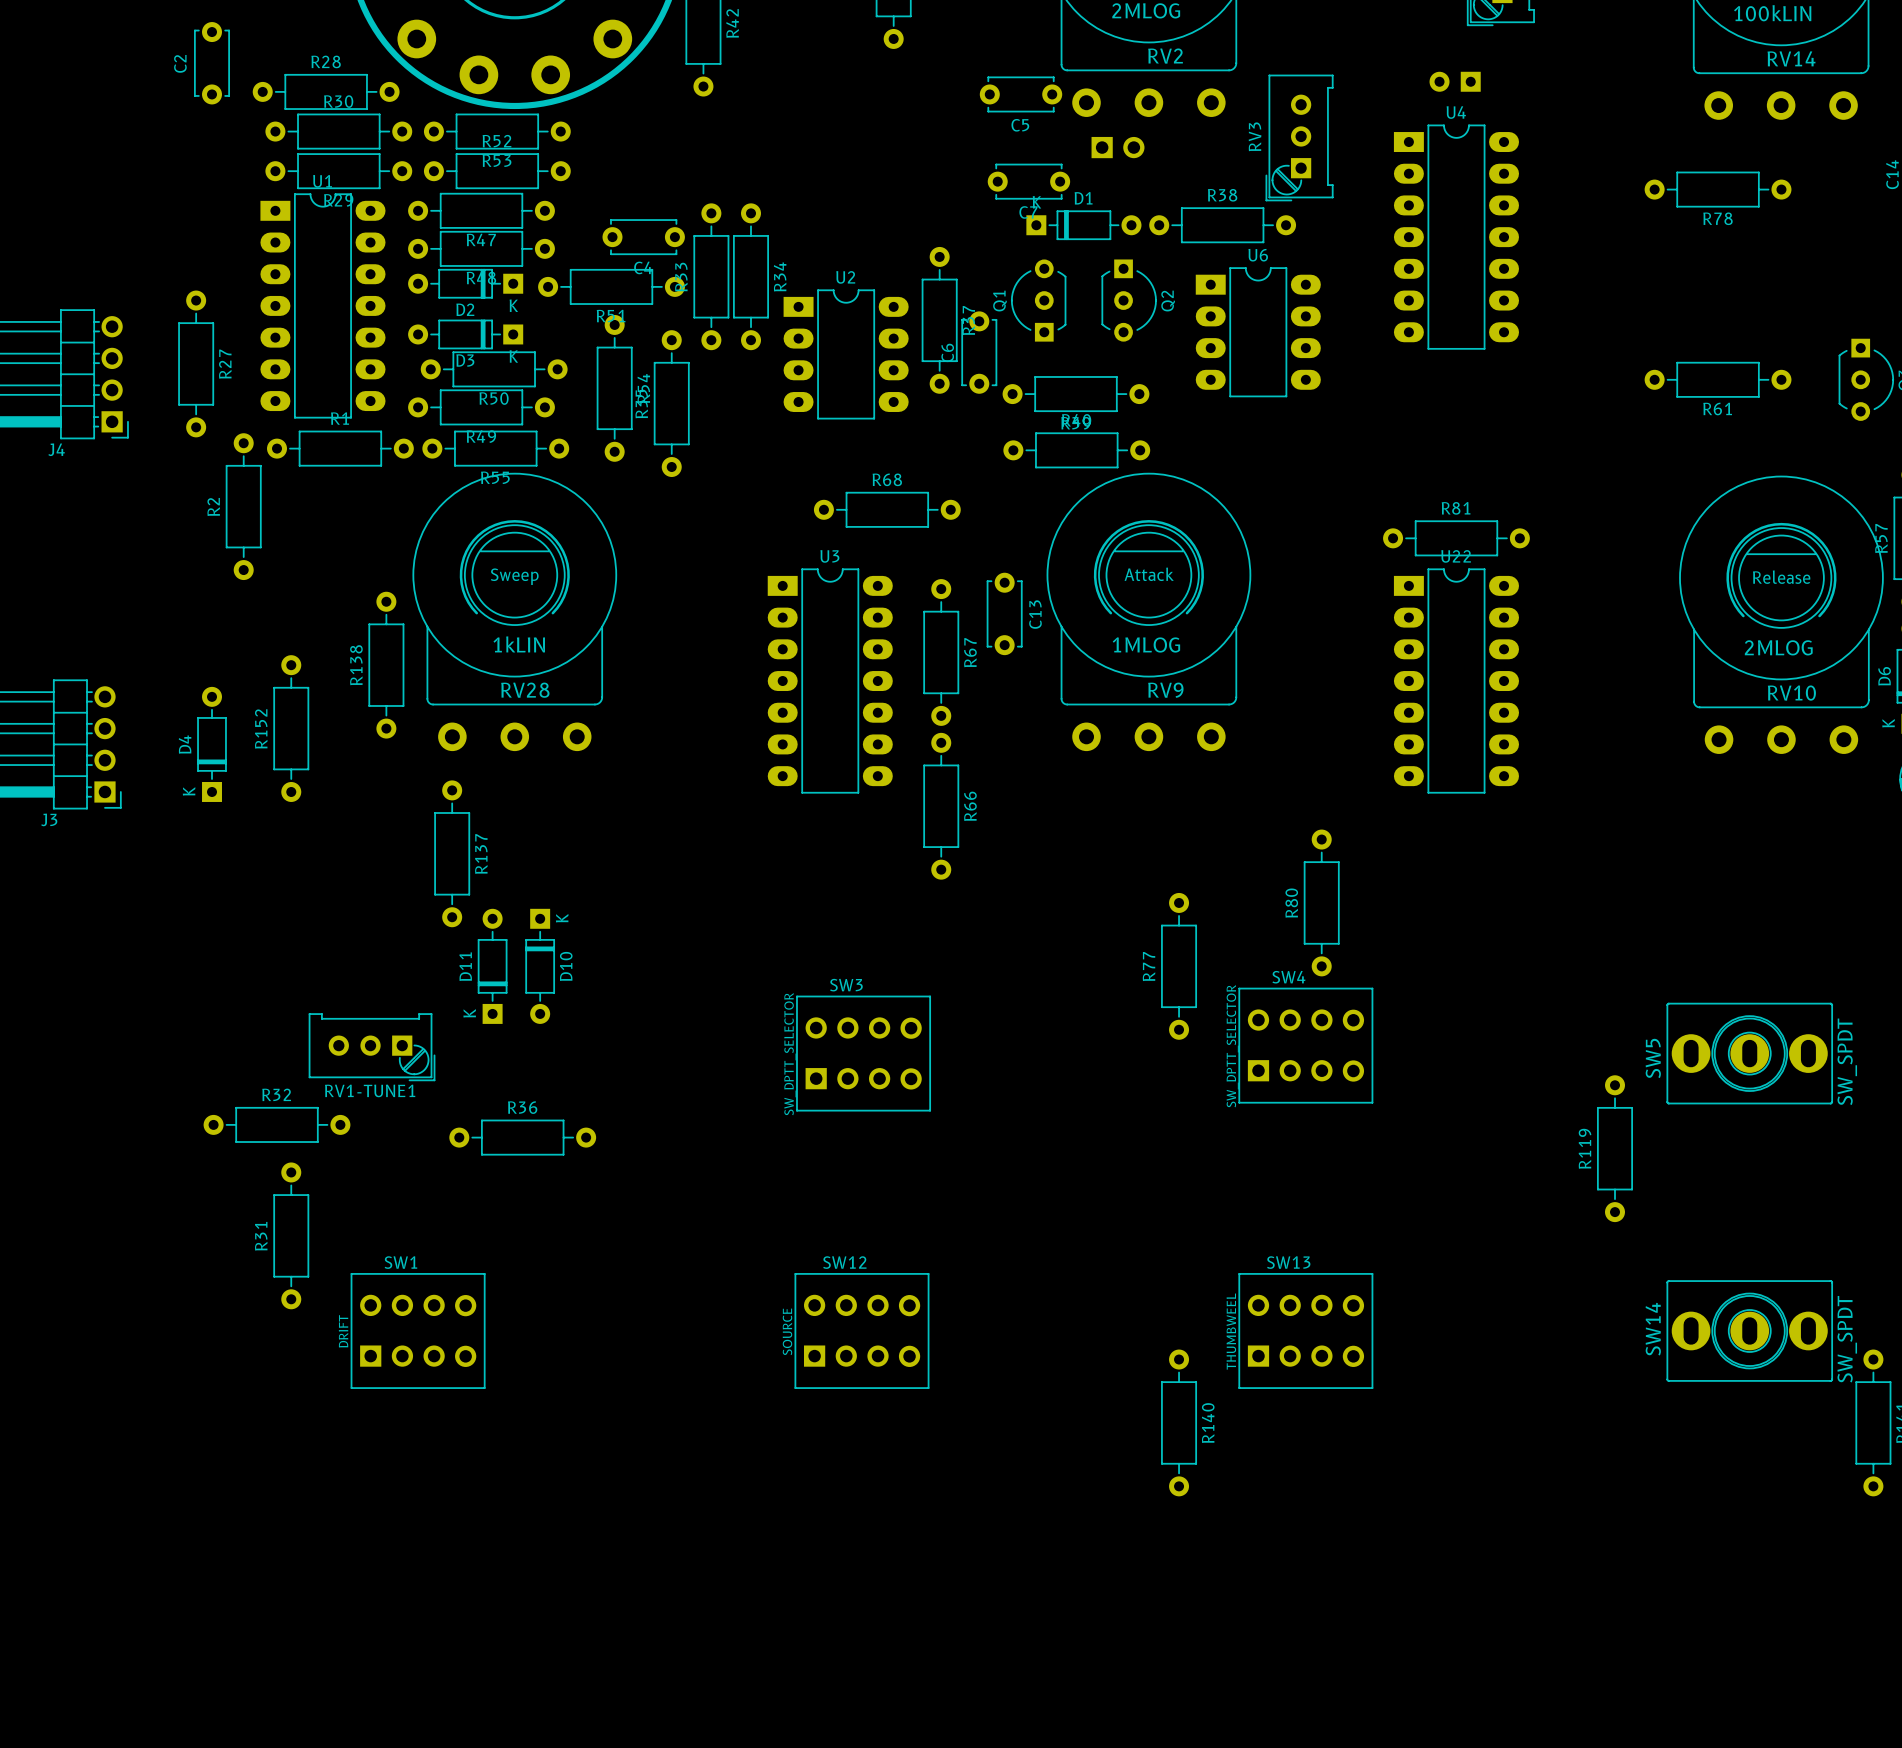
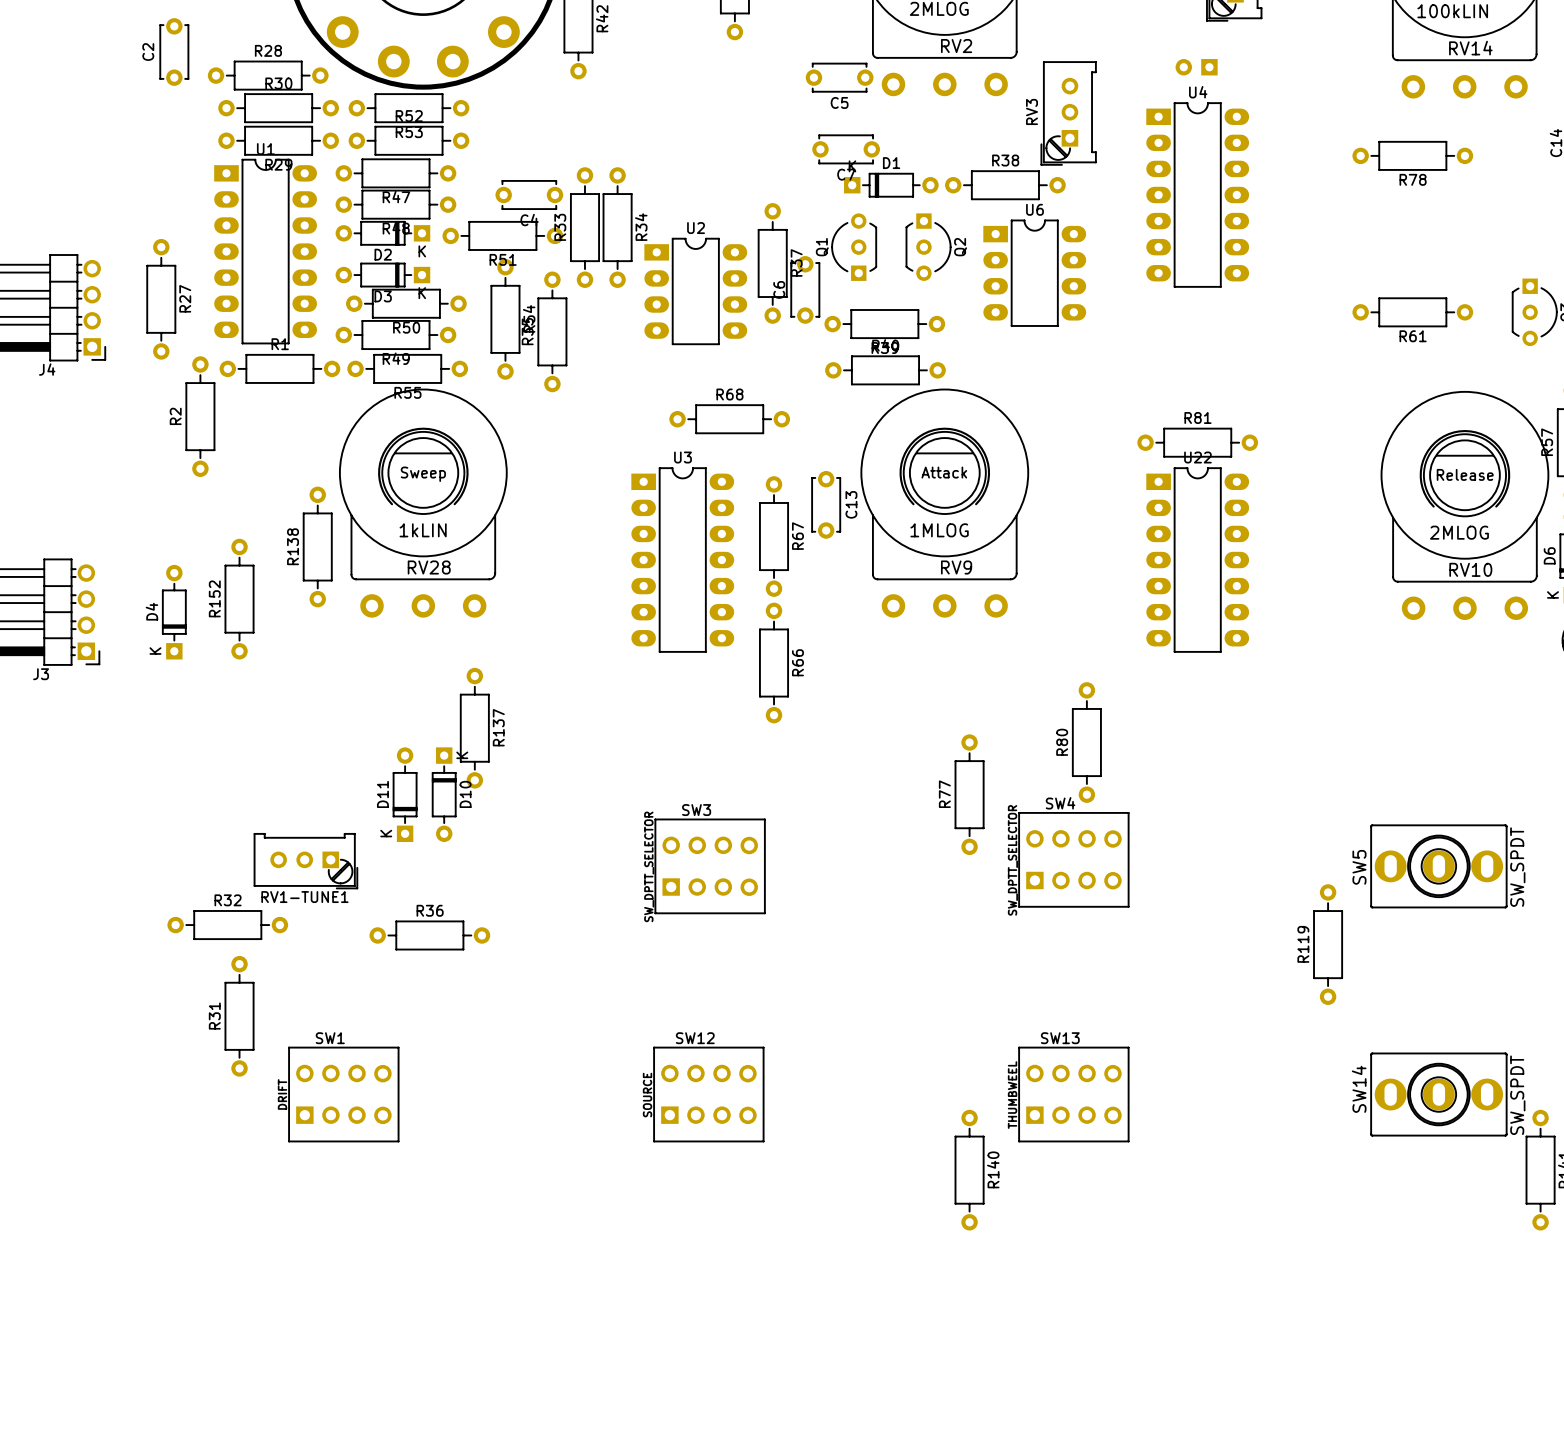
part: (1118, 147) -> none
R137 position: (452, 853) -> (474, 728)

